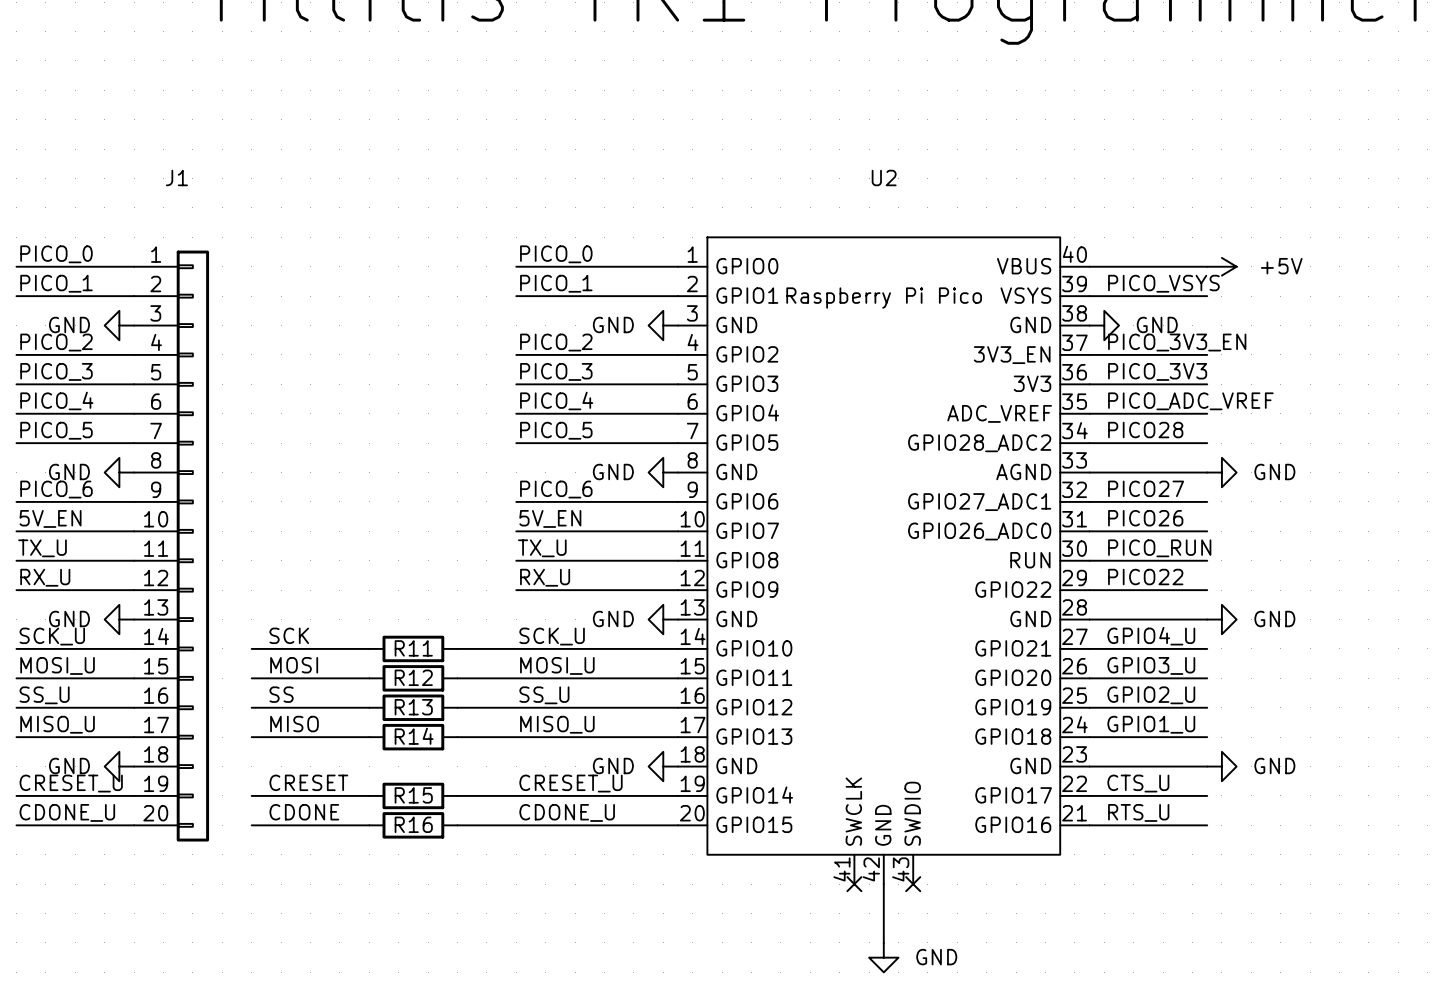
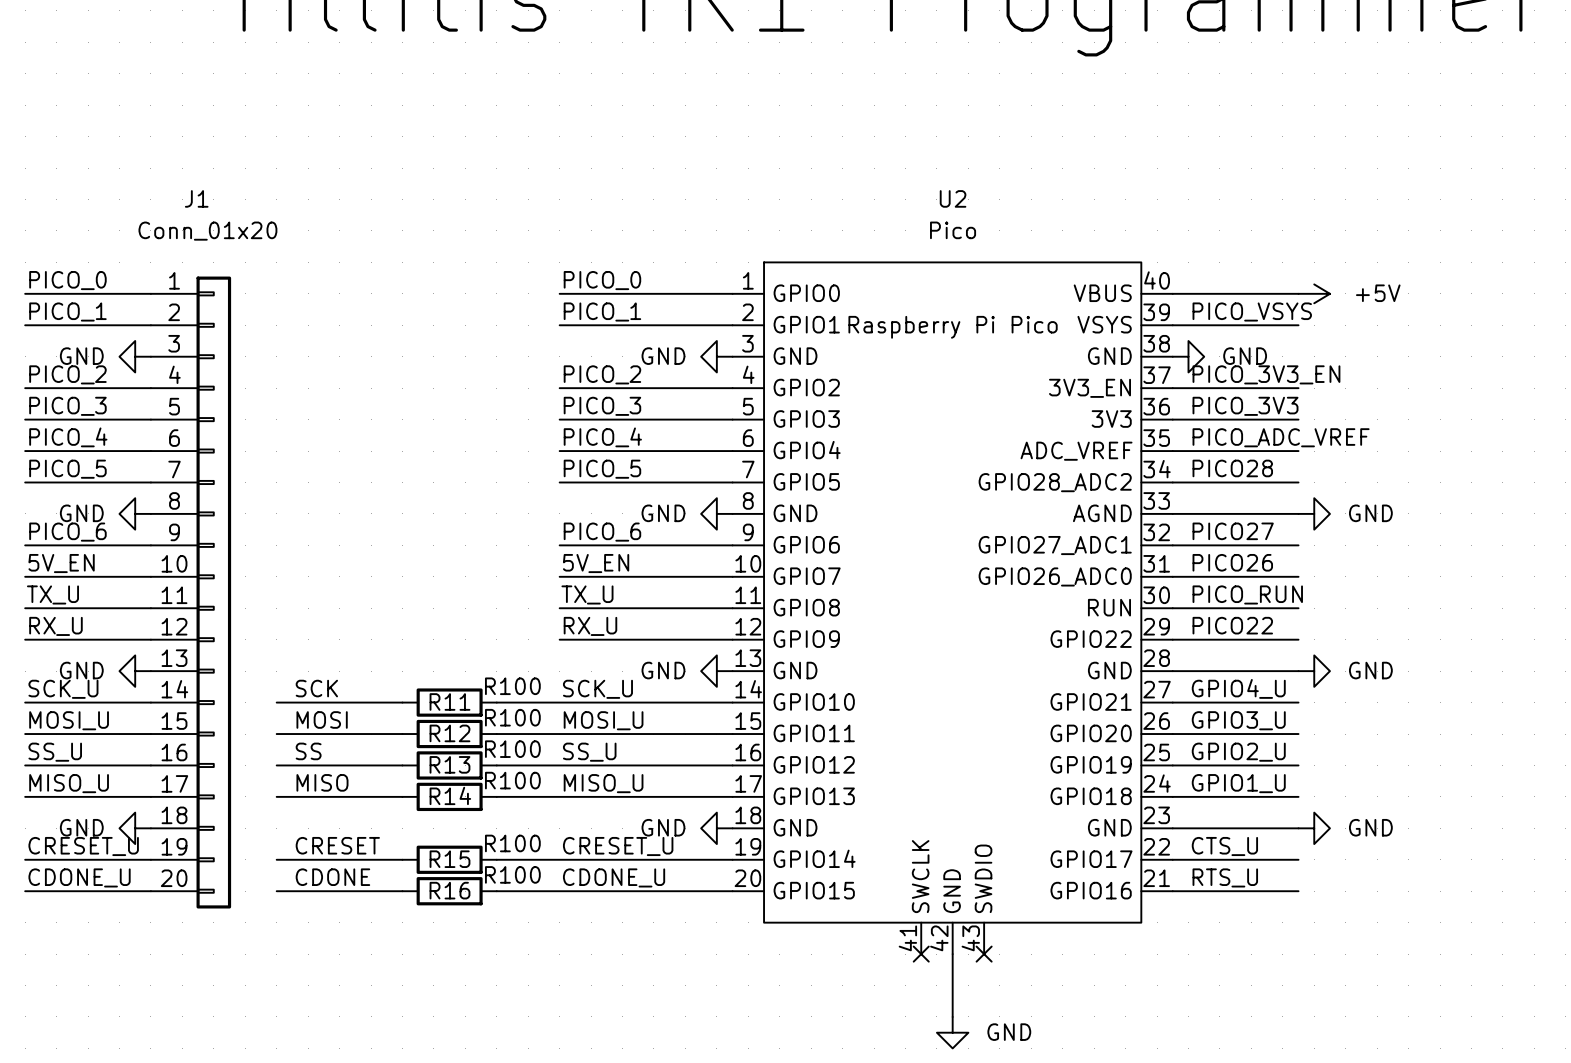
U2 value: none -> Pico (953, 230)
J1 value: none -> Conn_01x20 (207, 231)
R11 value: none -> R100 (512, 686)
R12 value: none -> R100 (512, 717)
R13 value: none -> R100 (512, 749)
R14 value: none -> R100 (512, 780)
R15 value: none -> R100 (512, 843)
R16 value: none -> R100 (512, 874)

